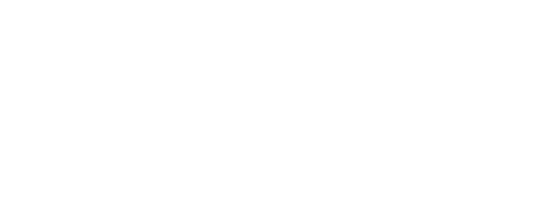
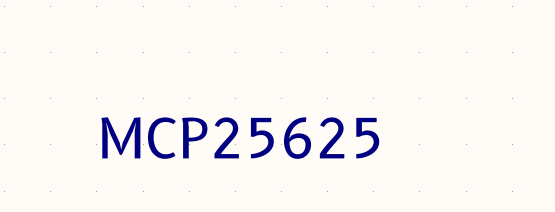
text: none -> MCP25625 (240, 138)

